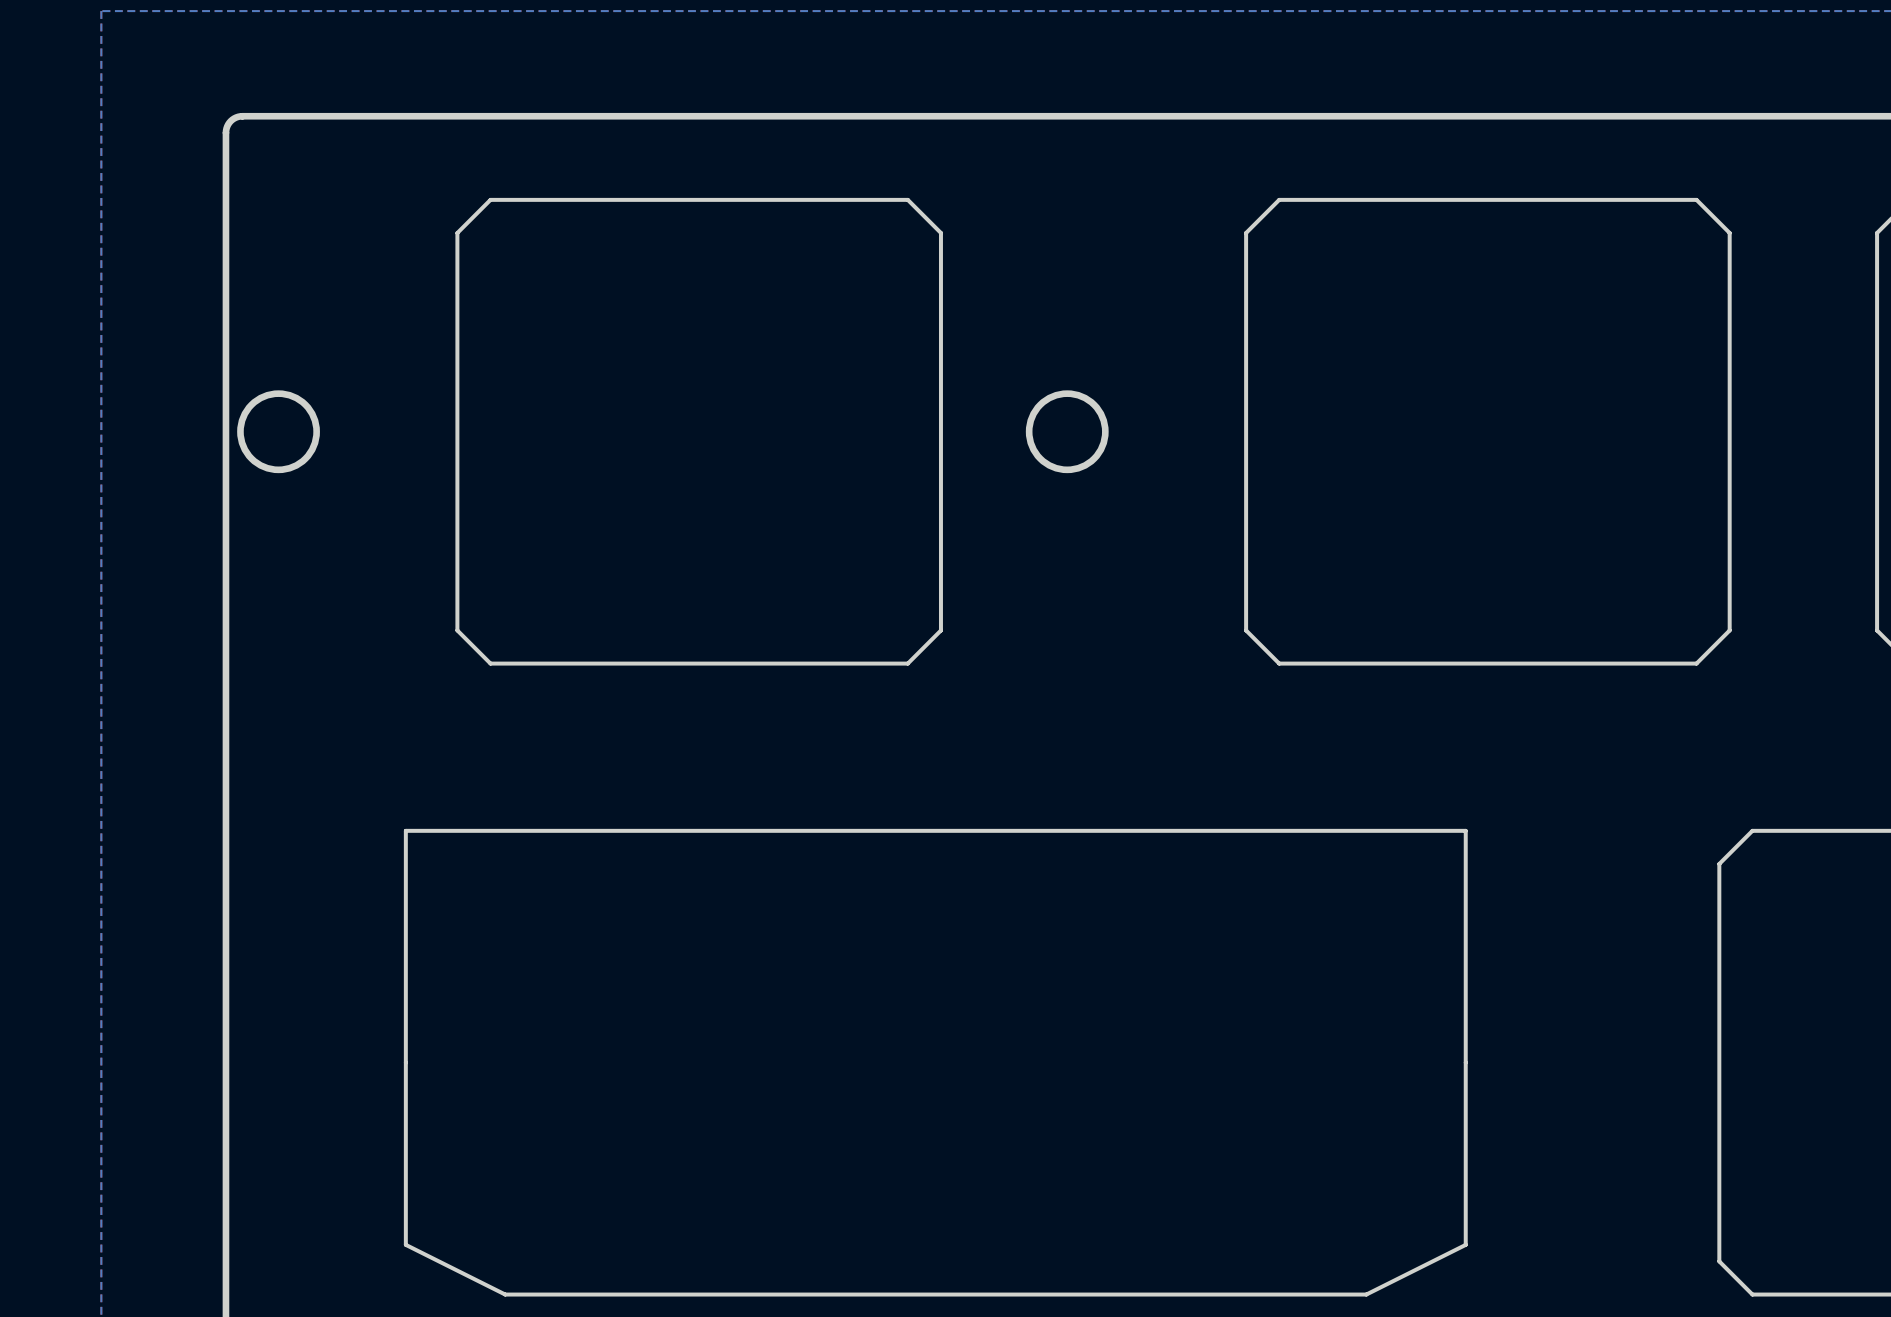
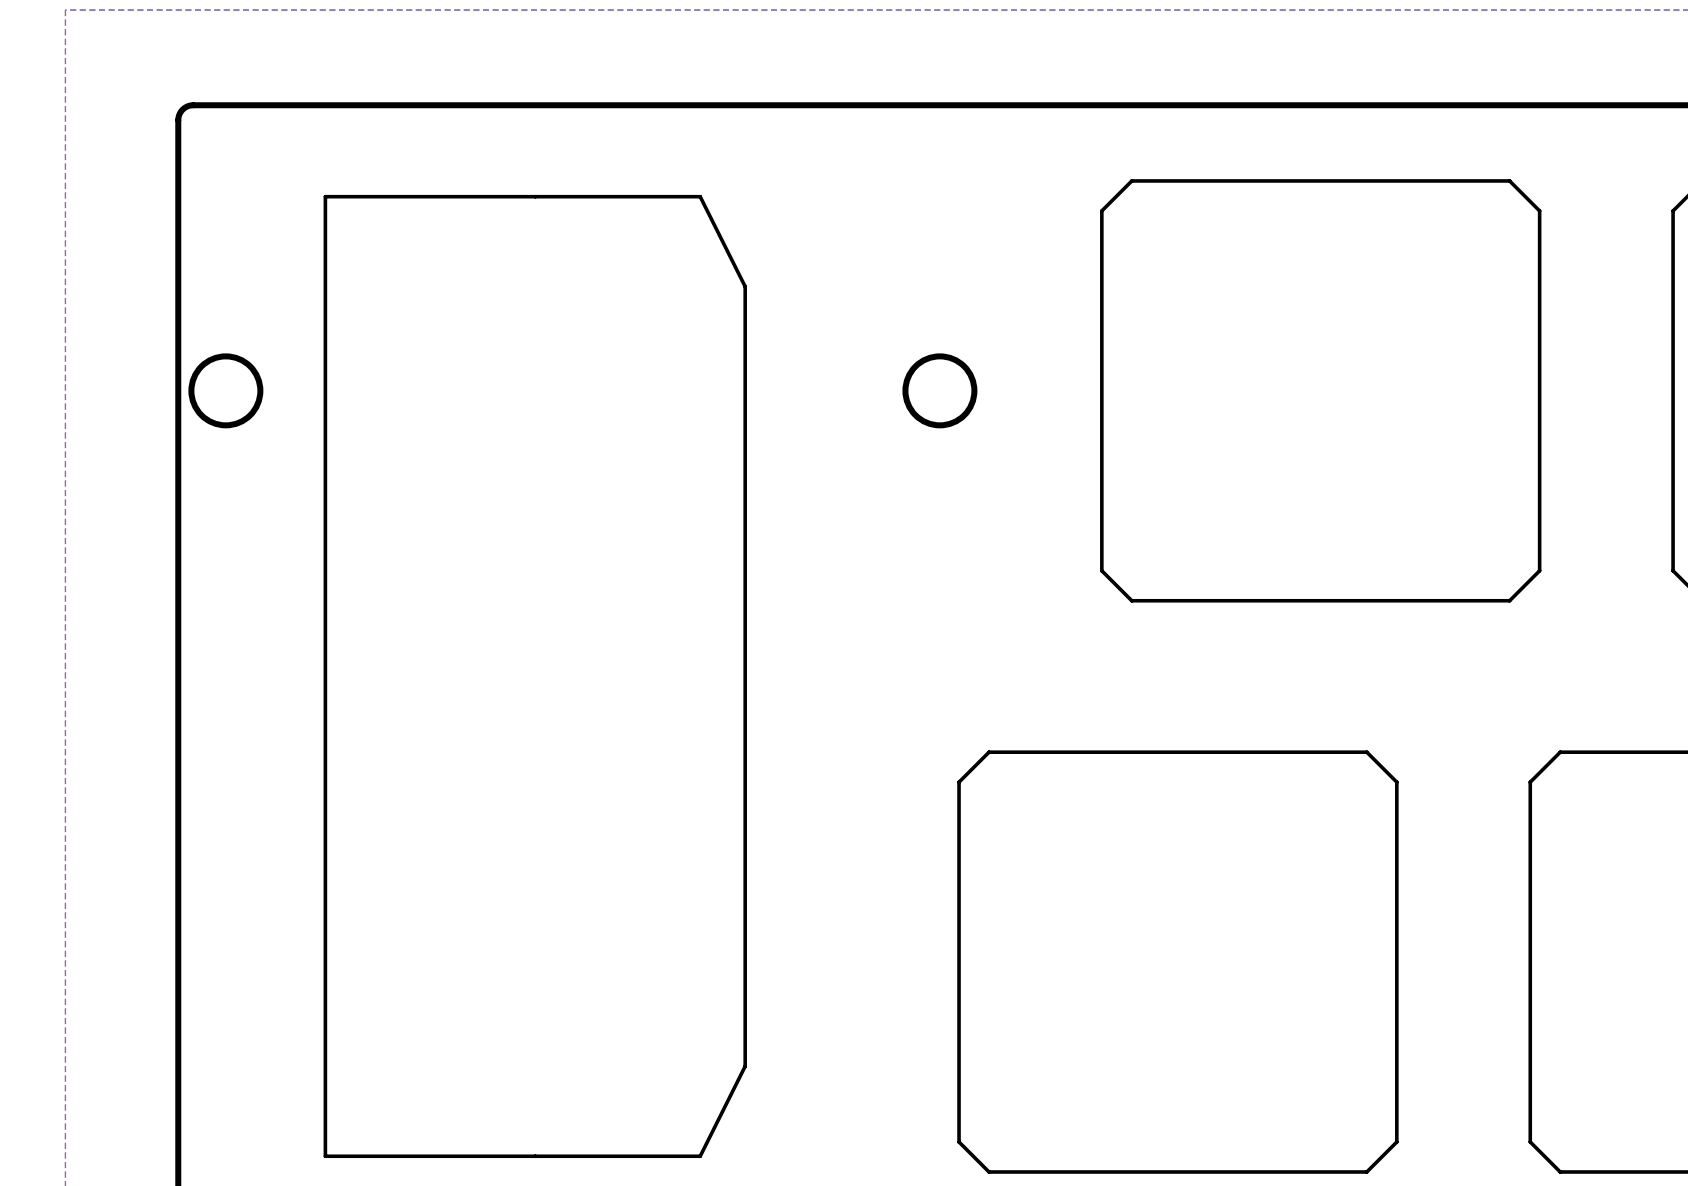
drawing: [455, 197, 943, 666] -> none
drawing: none -> [323, 194, 747, 1159]
drawing: [403, 828, 1468, 1297] -> none
drawing: none -> [957, 750, 1399, 1174]

